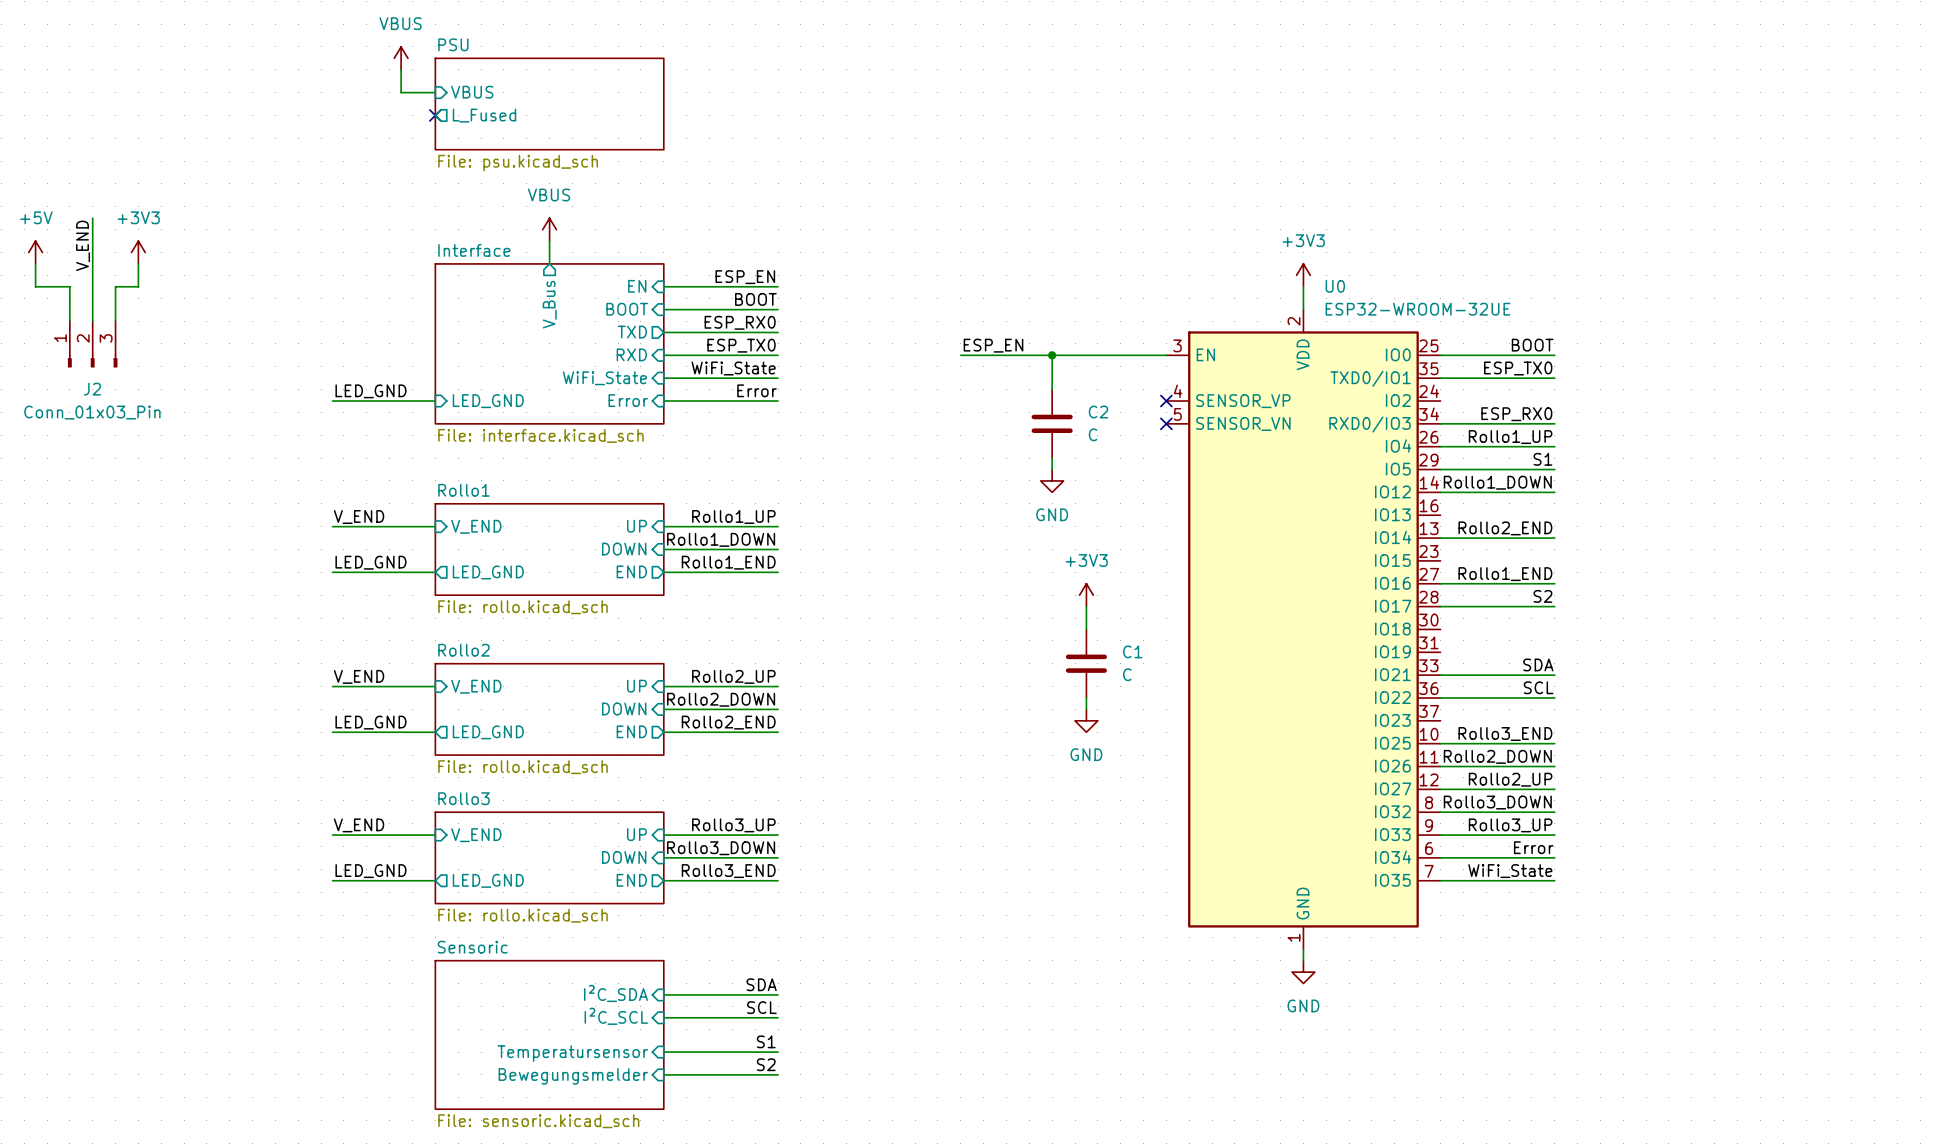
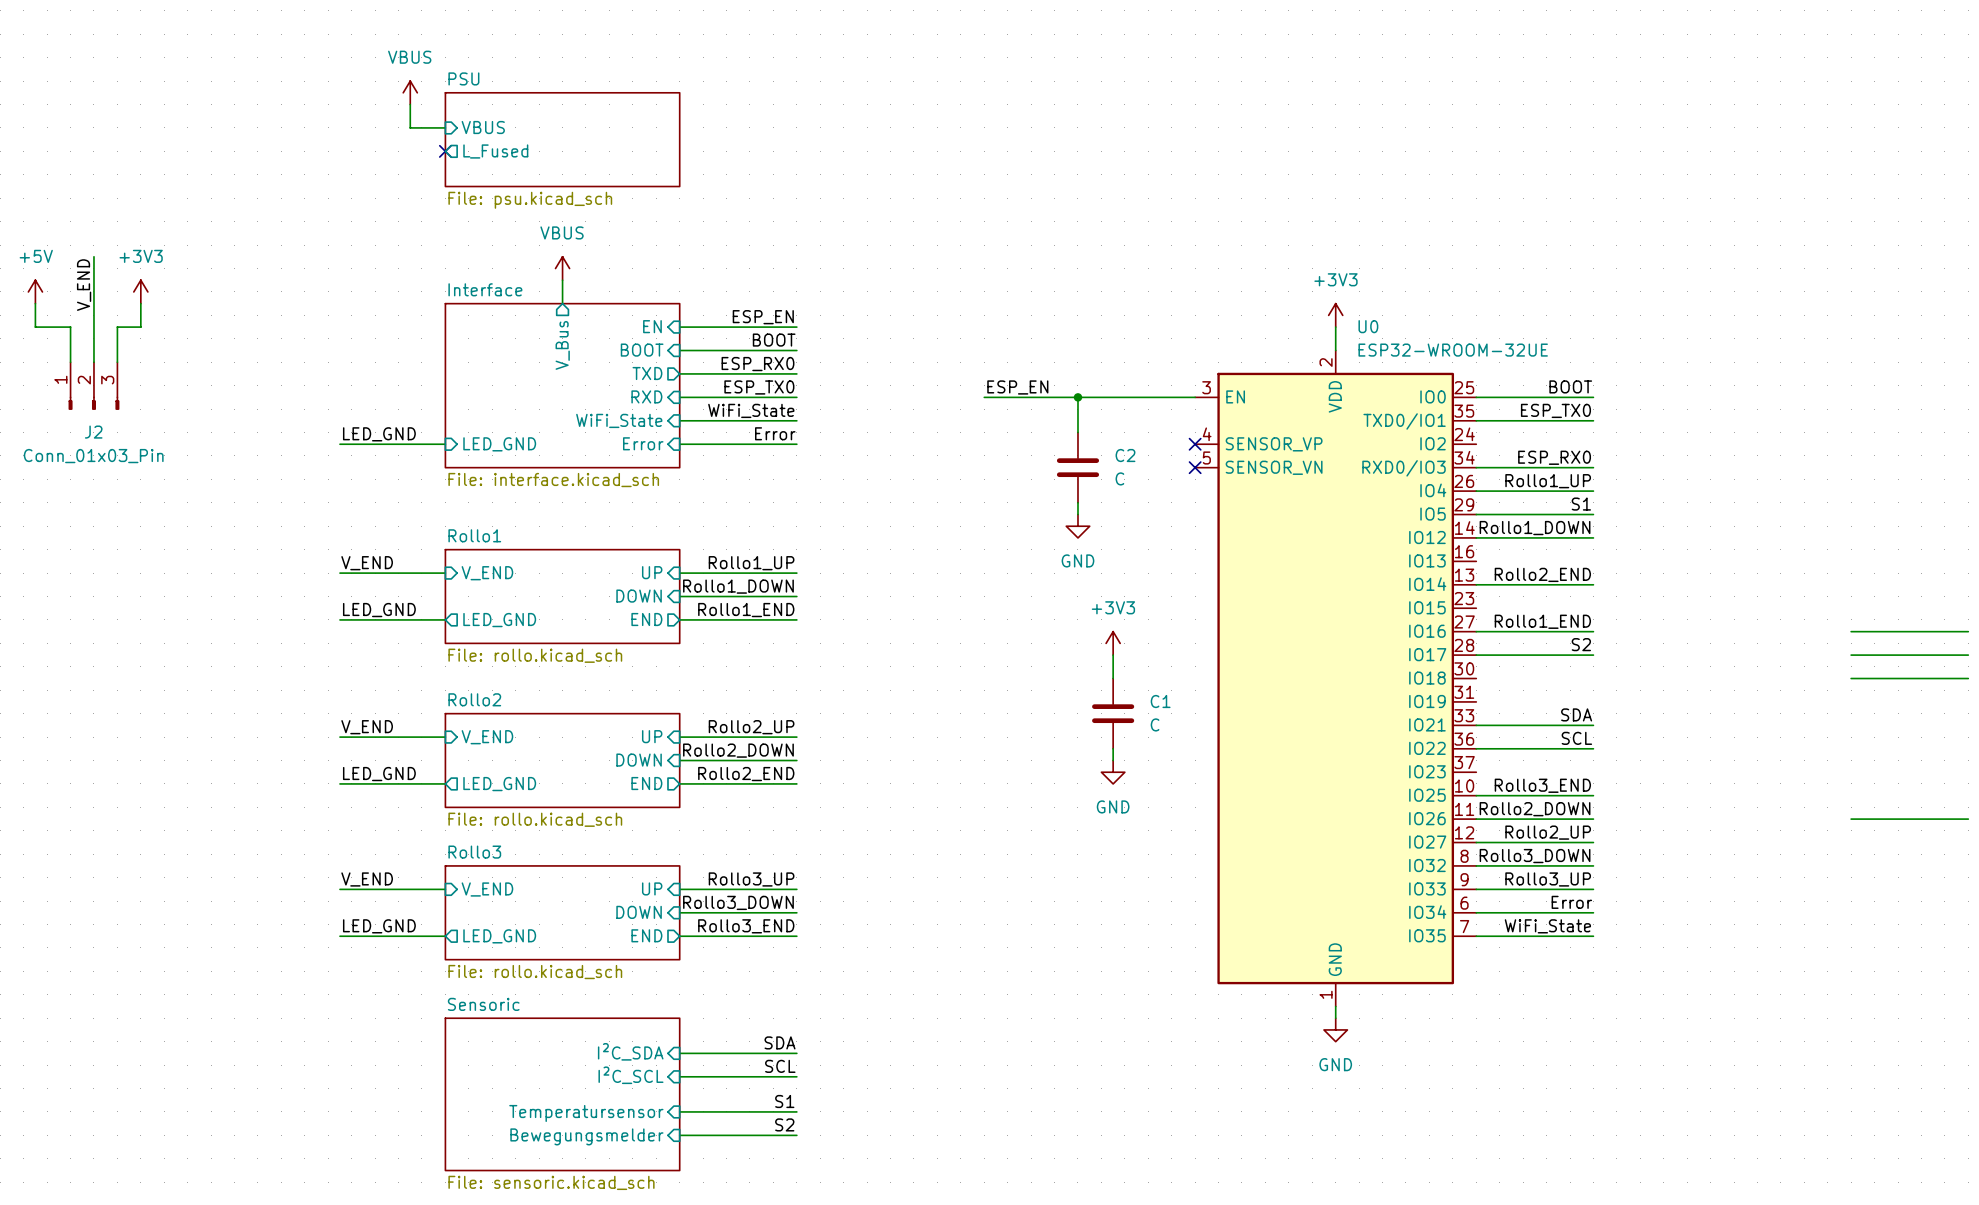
wire: none -> (1851, 631) (1968, 631)
wire: none -> (1851, 655) (1968, 655)
wire: none -> (1851, 678) (1968, 678)
wire: none -> (1851, 819) (1968, 819)

